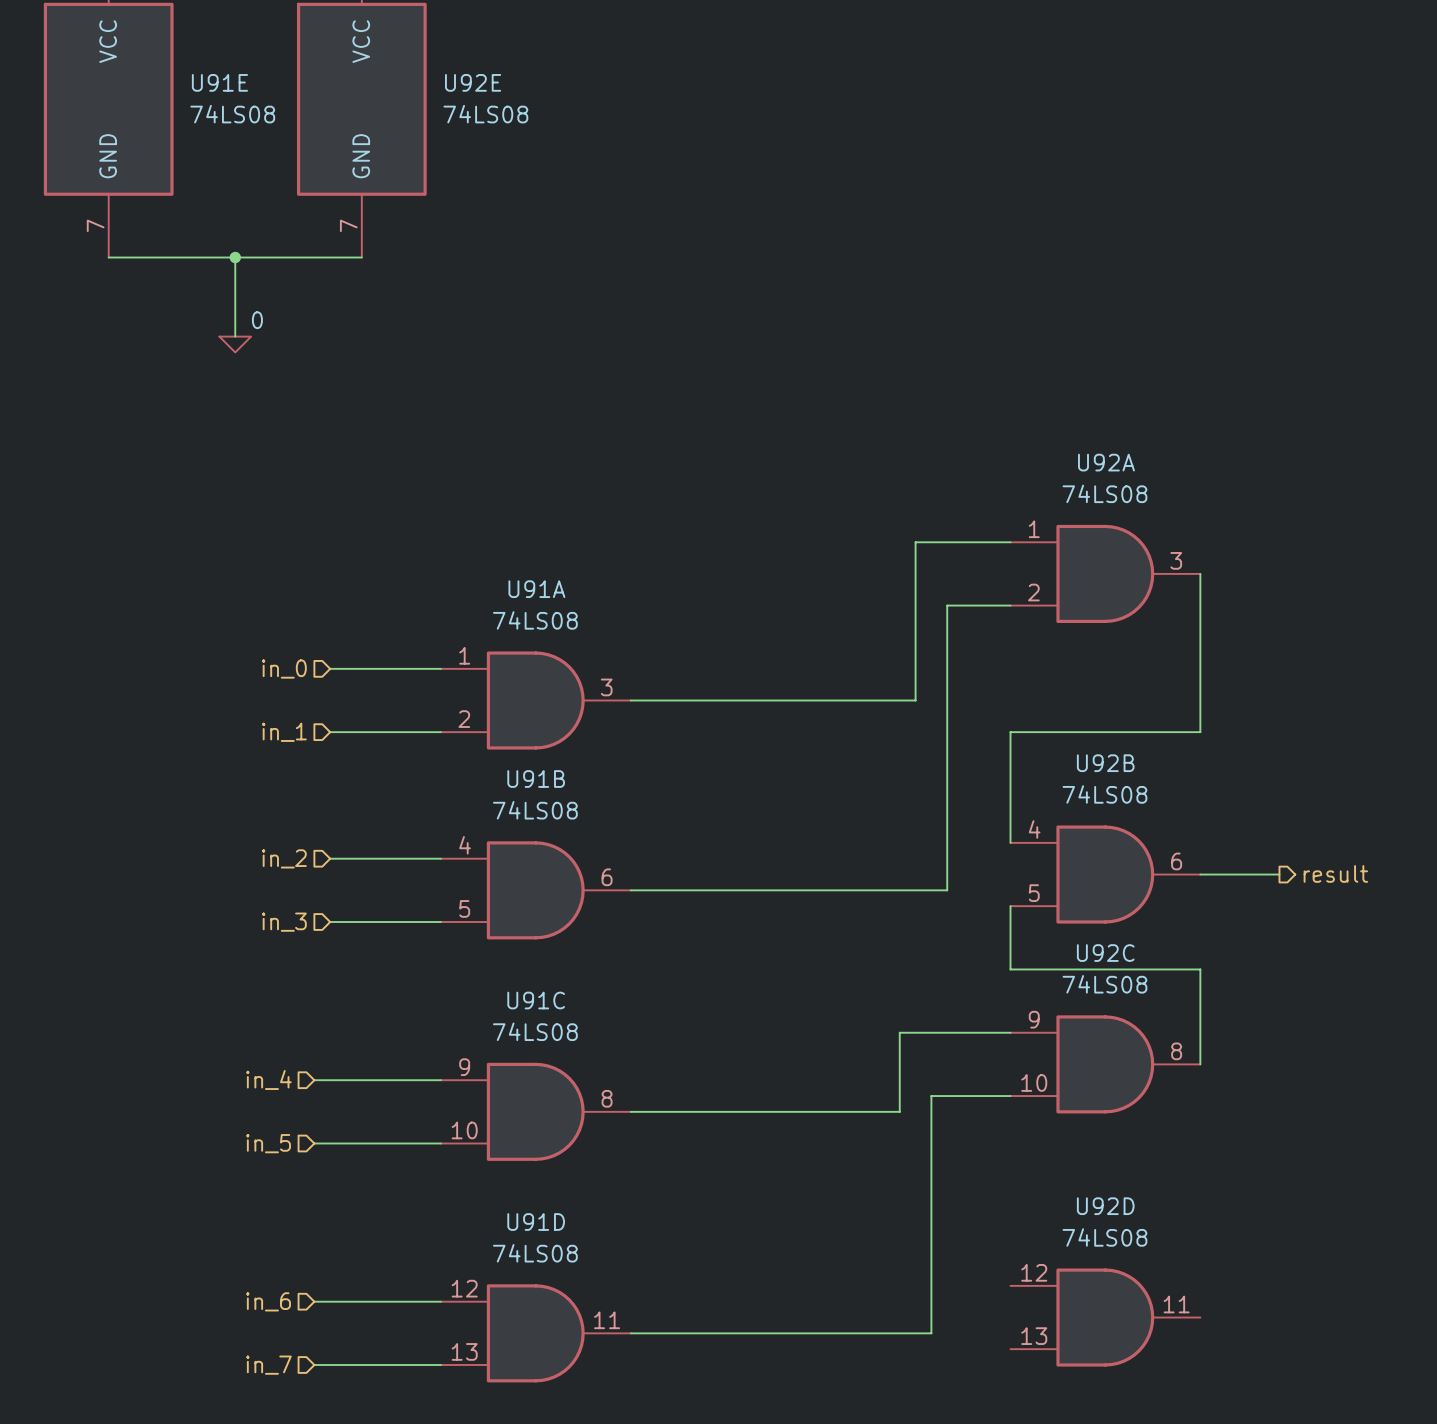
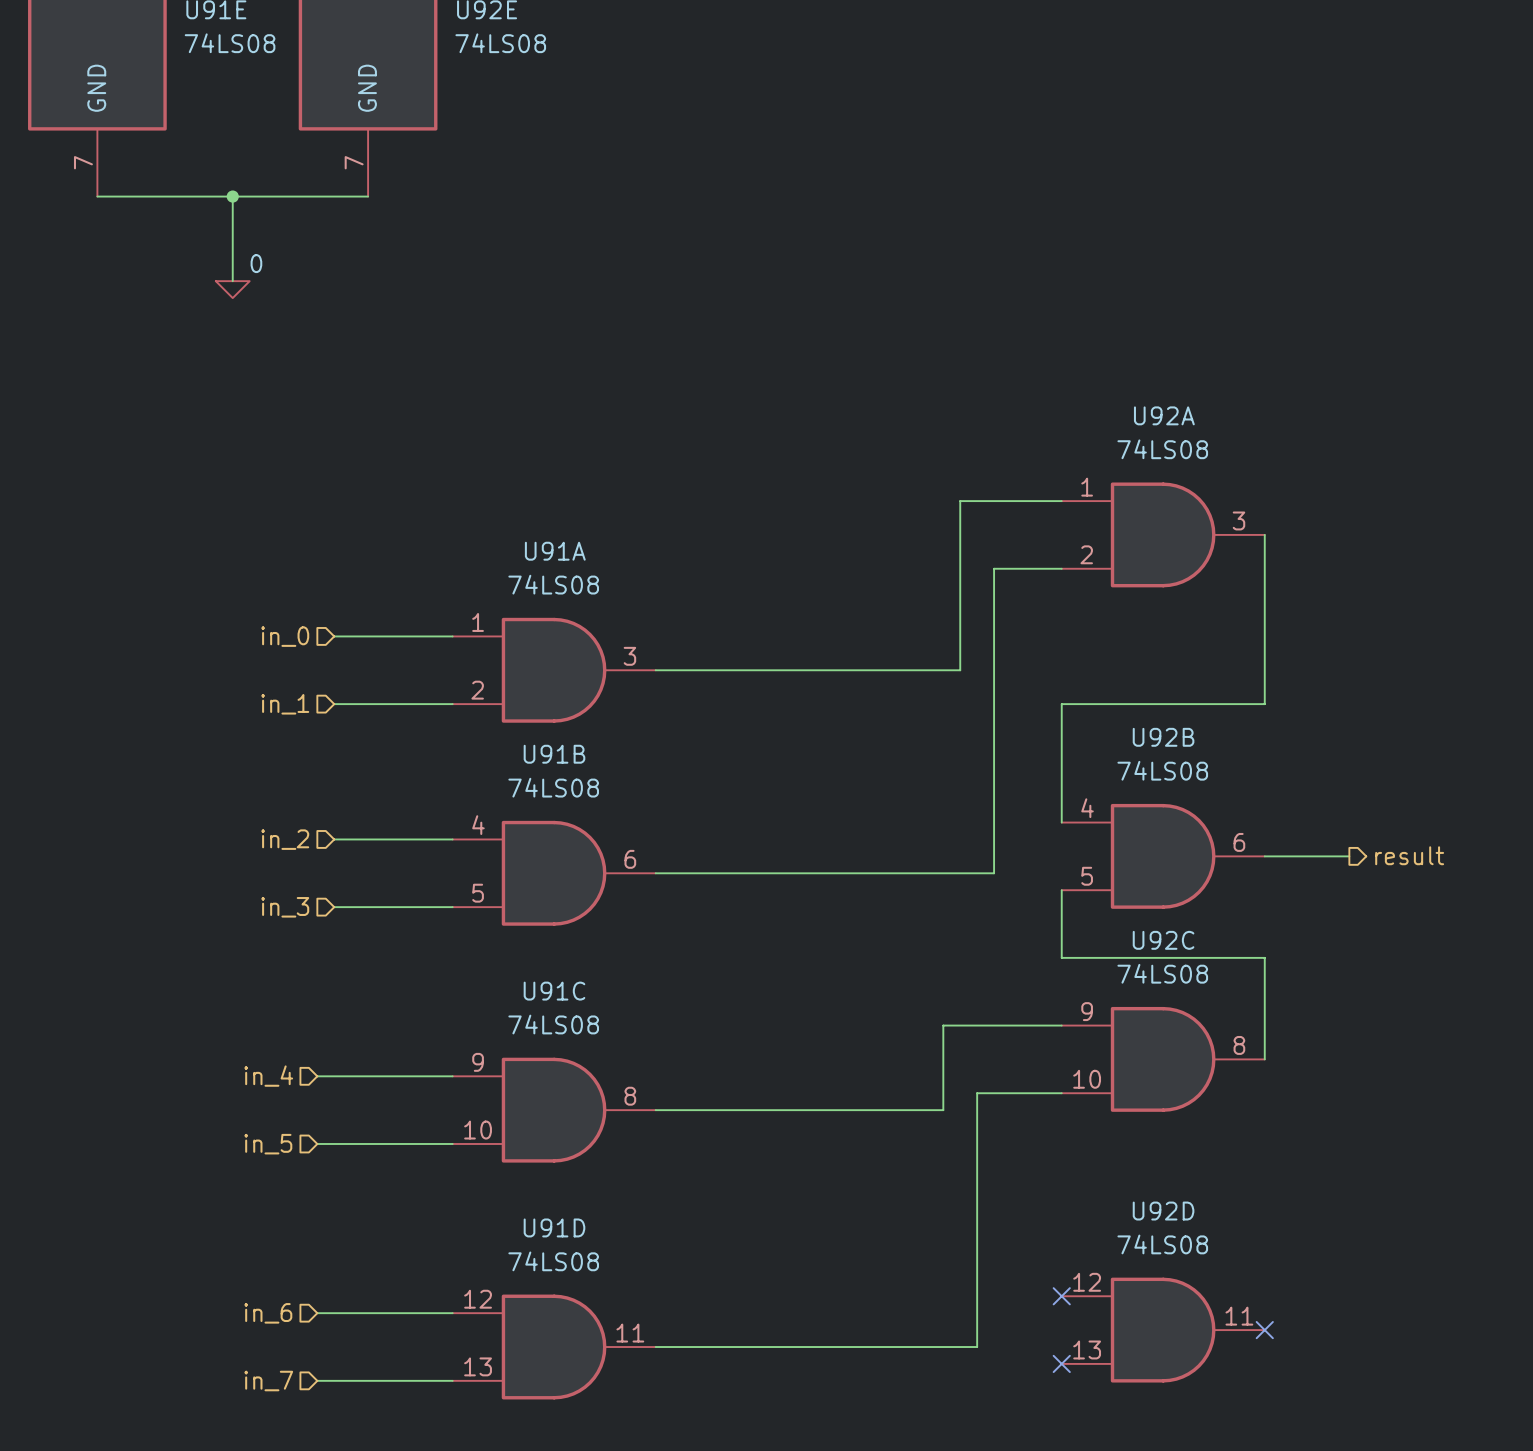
no-connect mark: none -> (1061, 1296)
no-connect mark: none -> (1264, 1330)
no-connect mark: none -> (1061, 1363)

